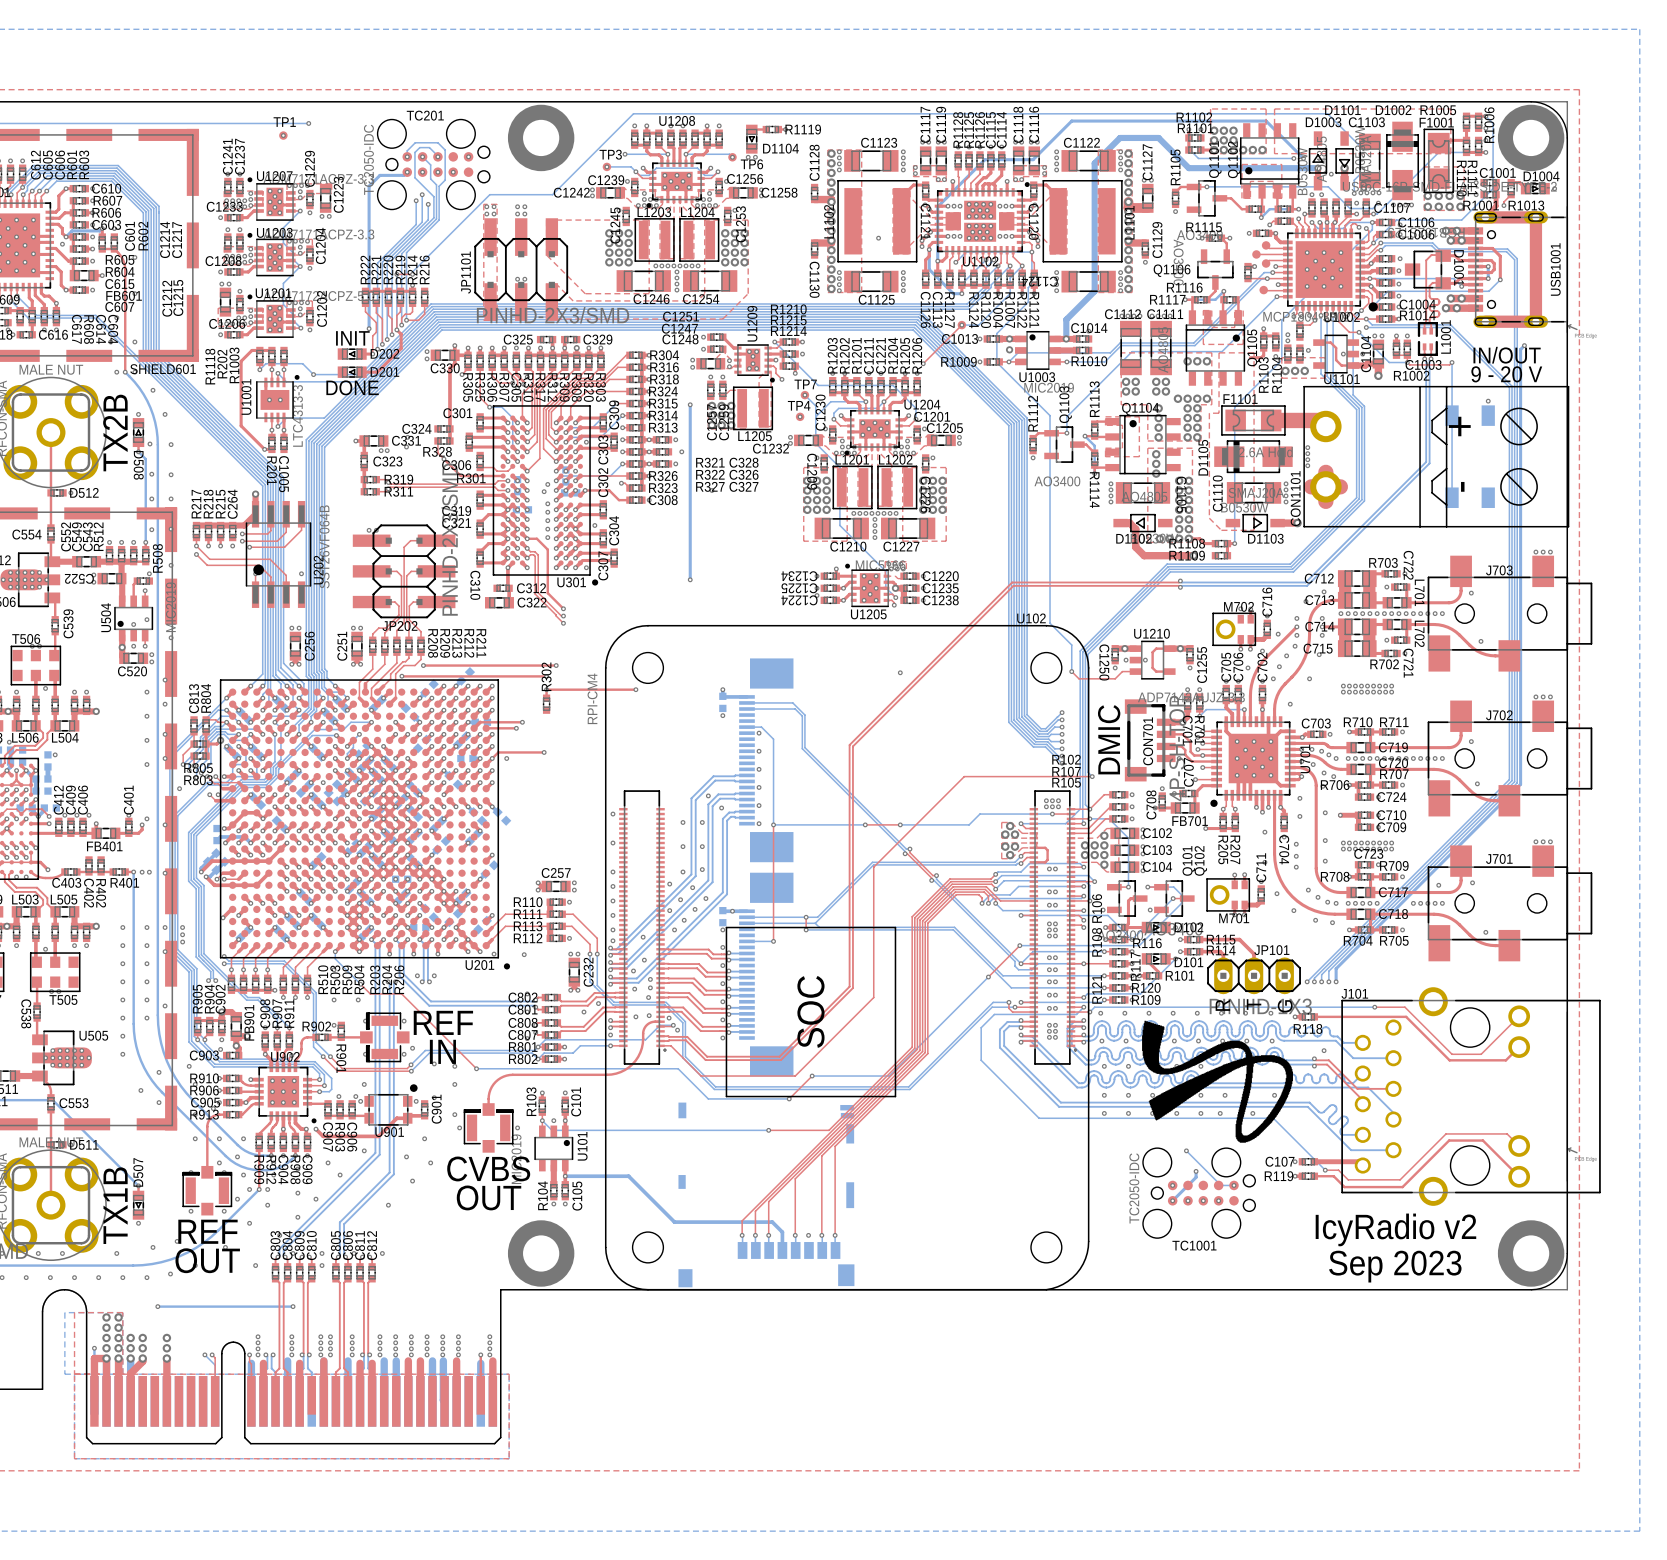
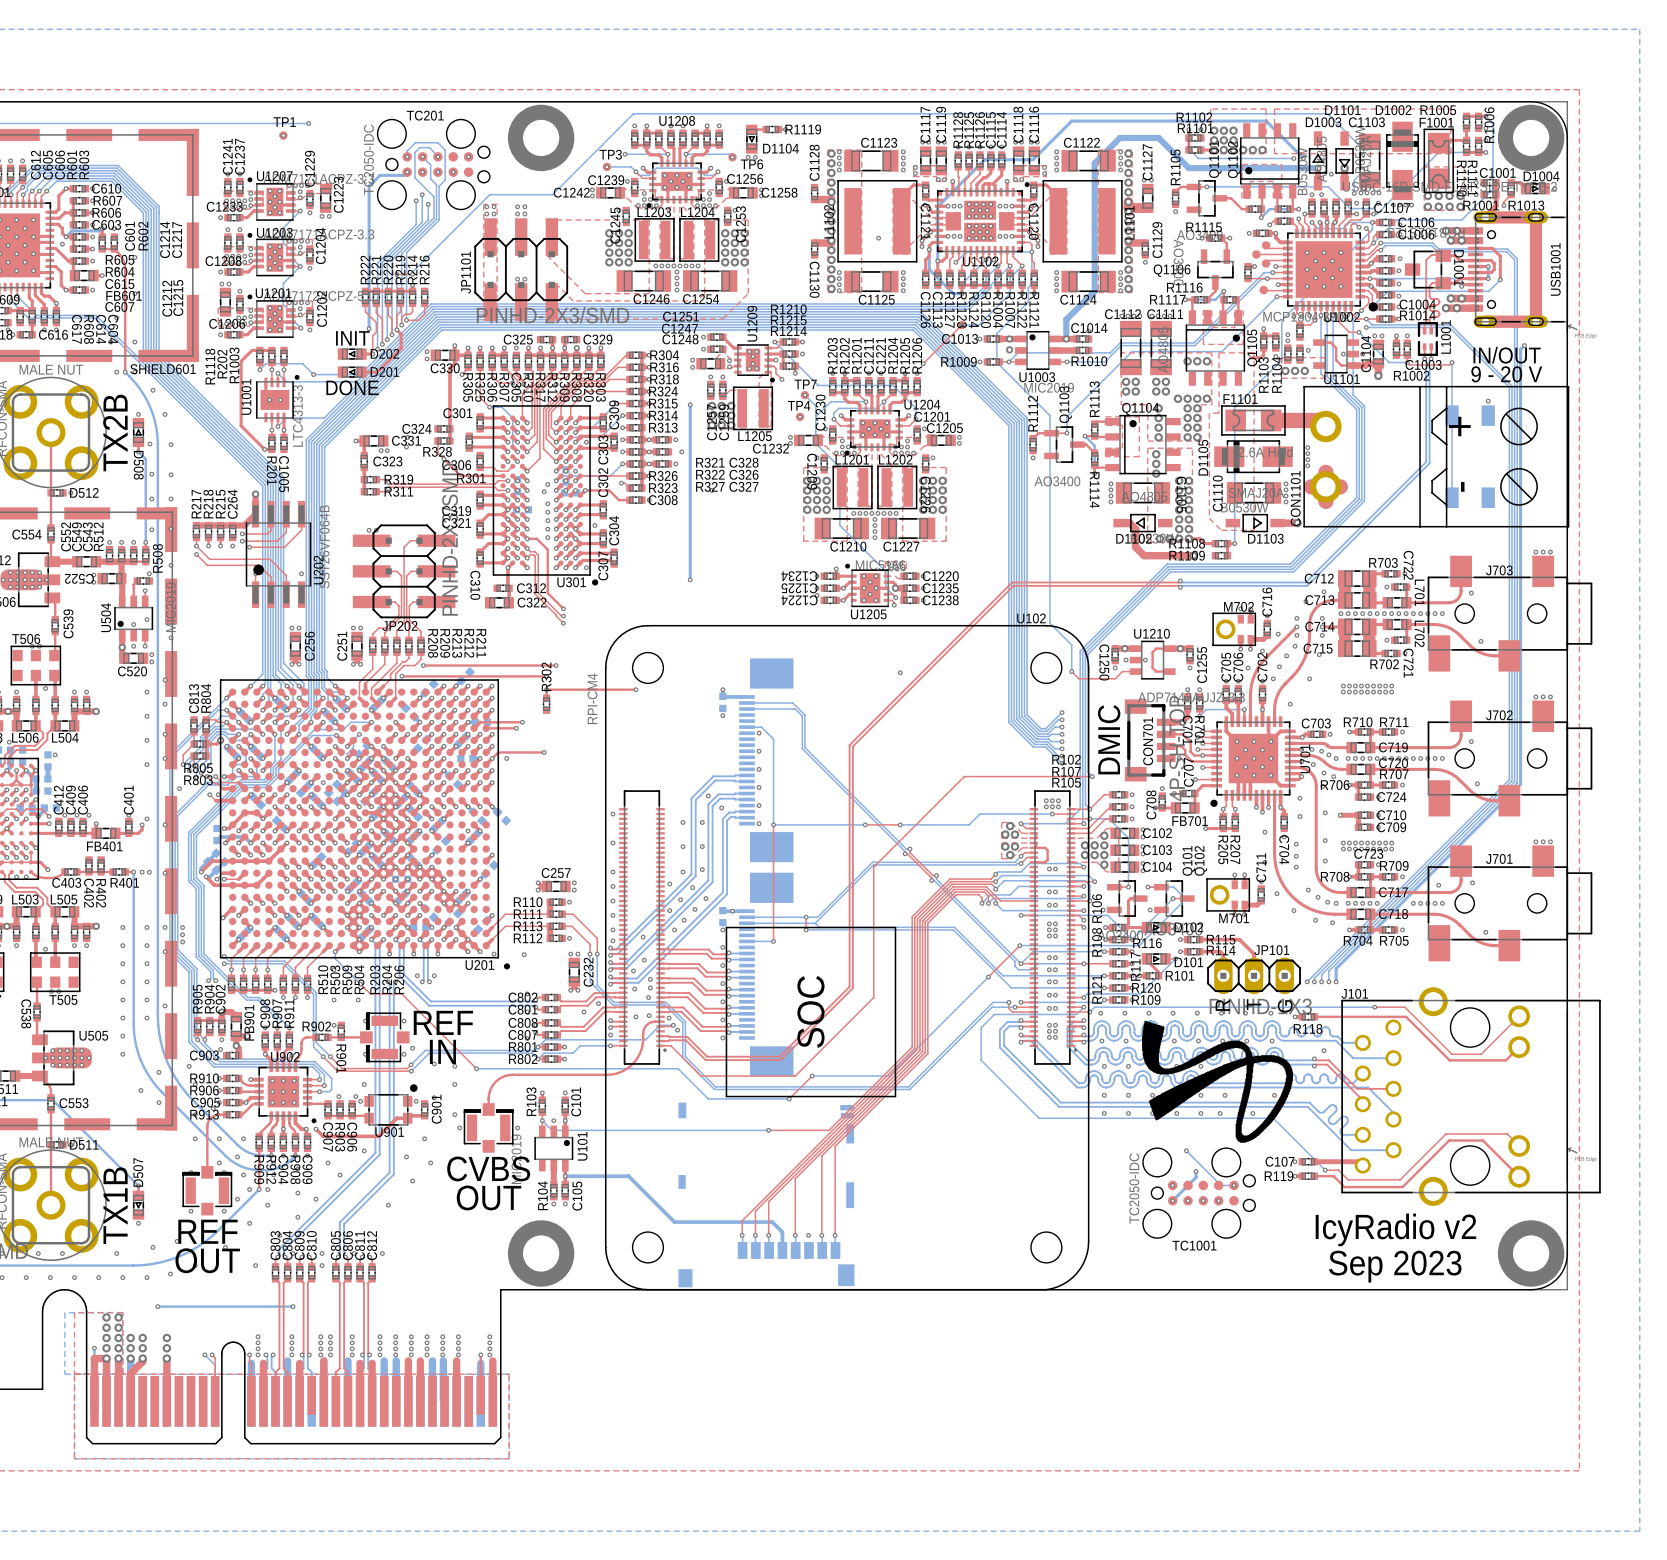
C1124 name rotation: 0° (1039, 281) -> 180° (1078, 299)
C1124 name position: C1124 (1039, 281) -> C1124 (1078, 299)
R1123 name: none -> R1123 (961, 310)

